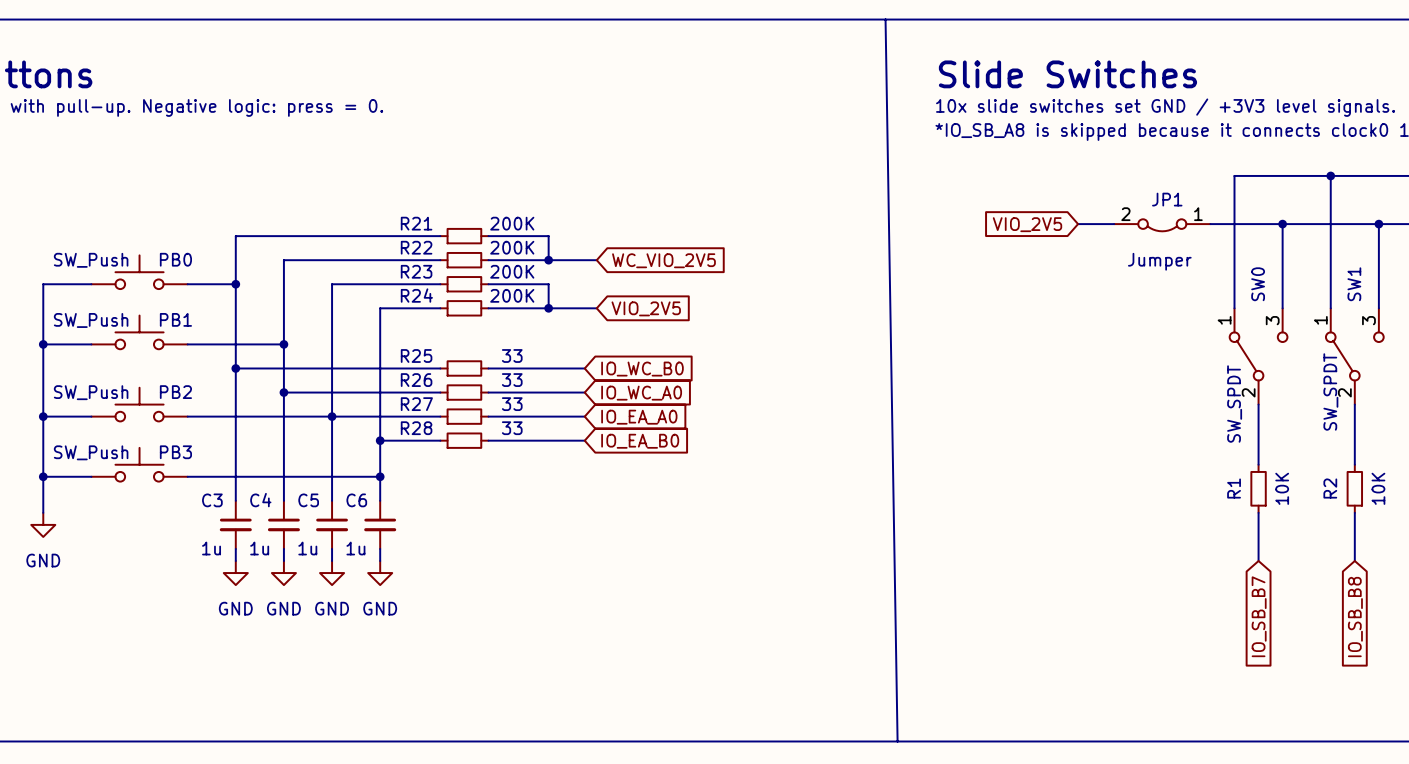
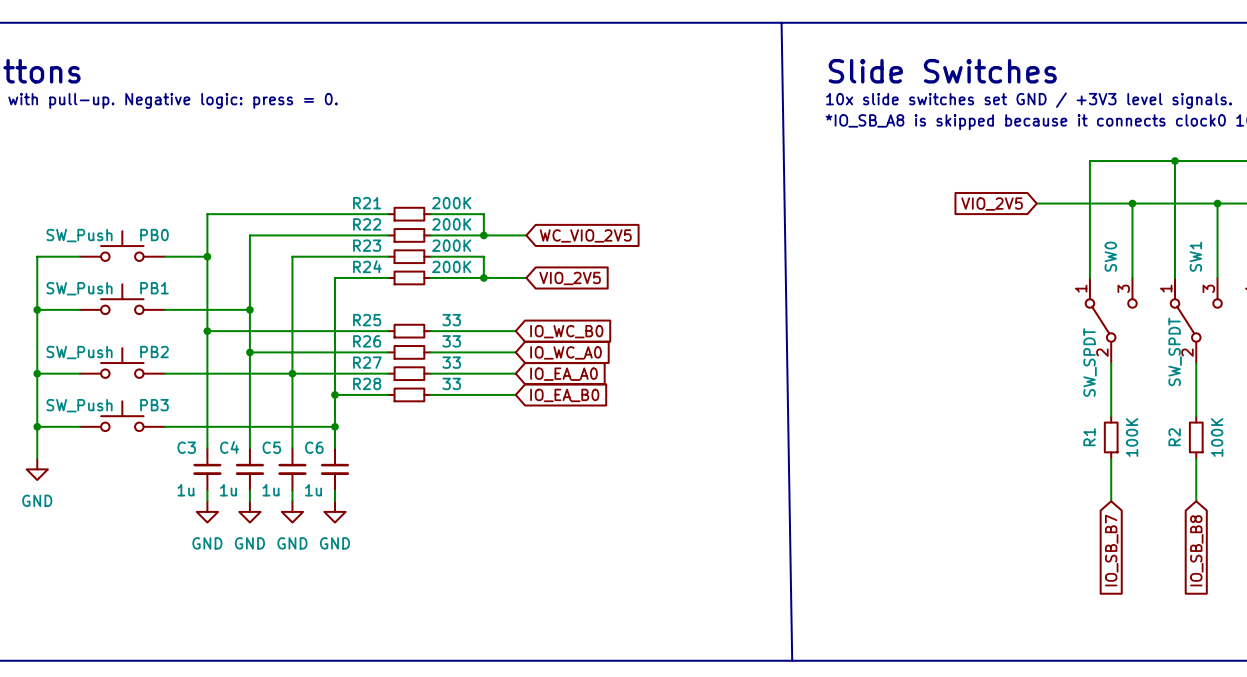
global label position: VIO_2V5 (1027, 224) -> VIO_2V5 (992, 204)
JP1: Jumper (1162, 225) -> none
R1 value: 10K (1282, 488) -> 100K (1132, 437)
R2 value: 10K (1378, 488) -> 100K (1217, 437)

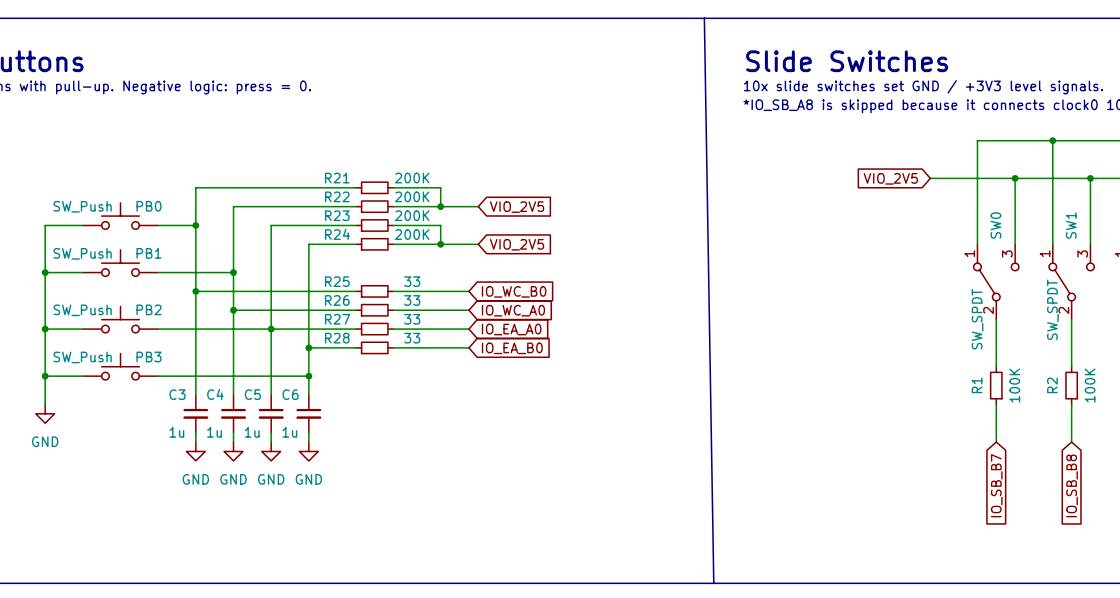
global label: WC_VIO_2V5 (585, 235) -> VIO_2V5 (517, 207)

